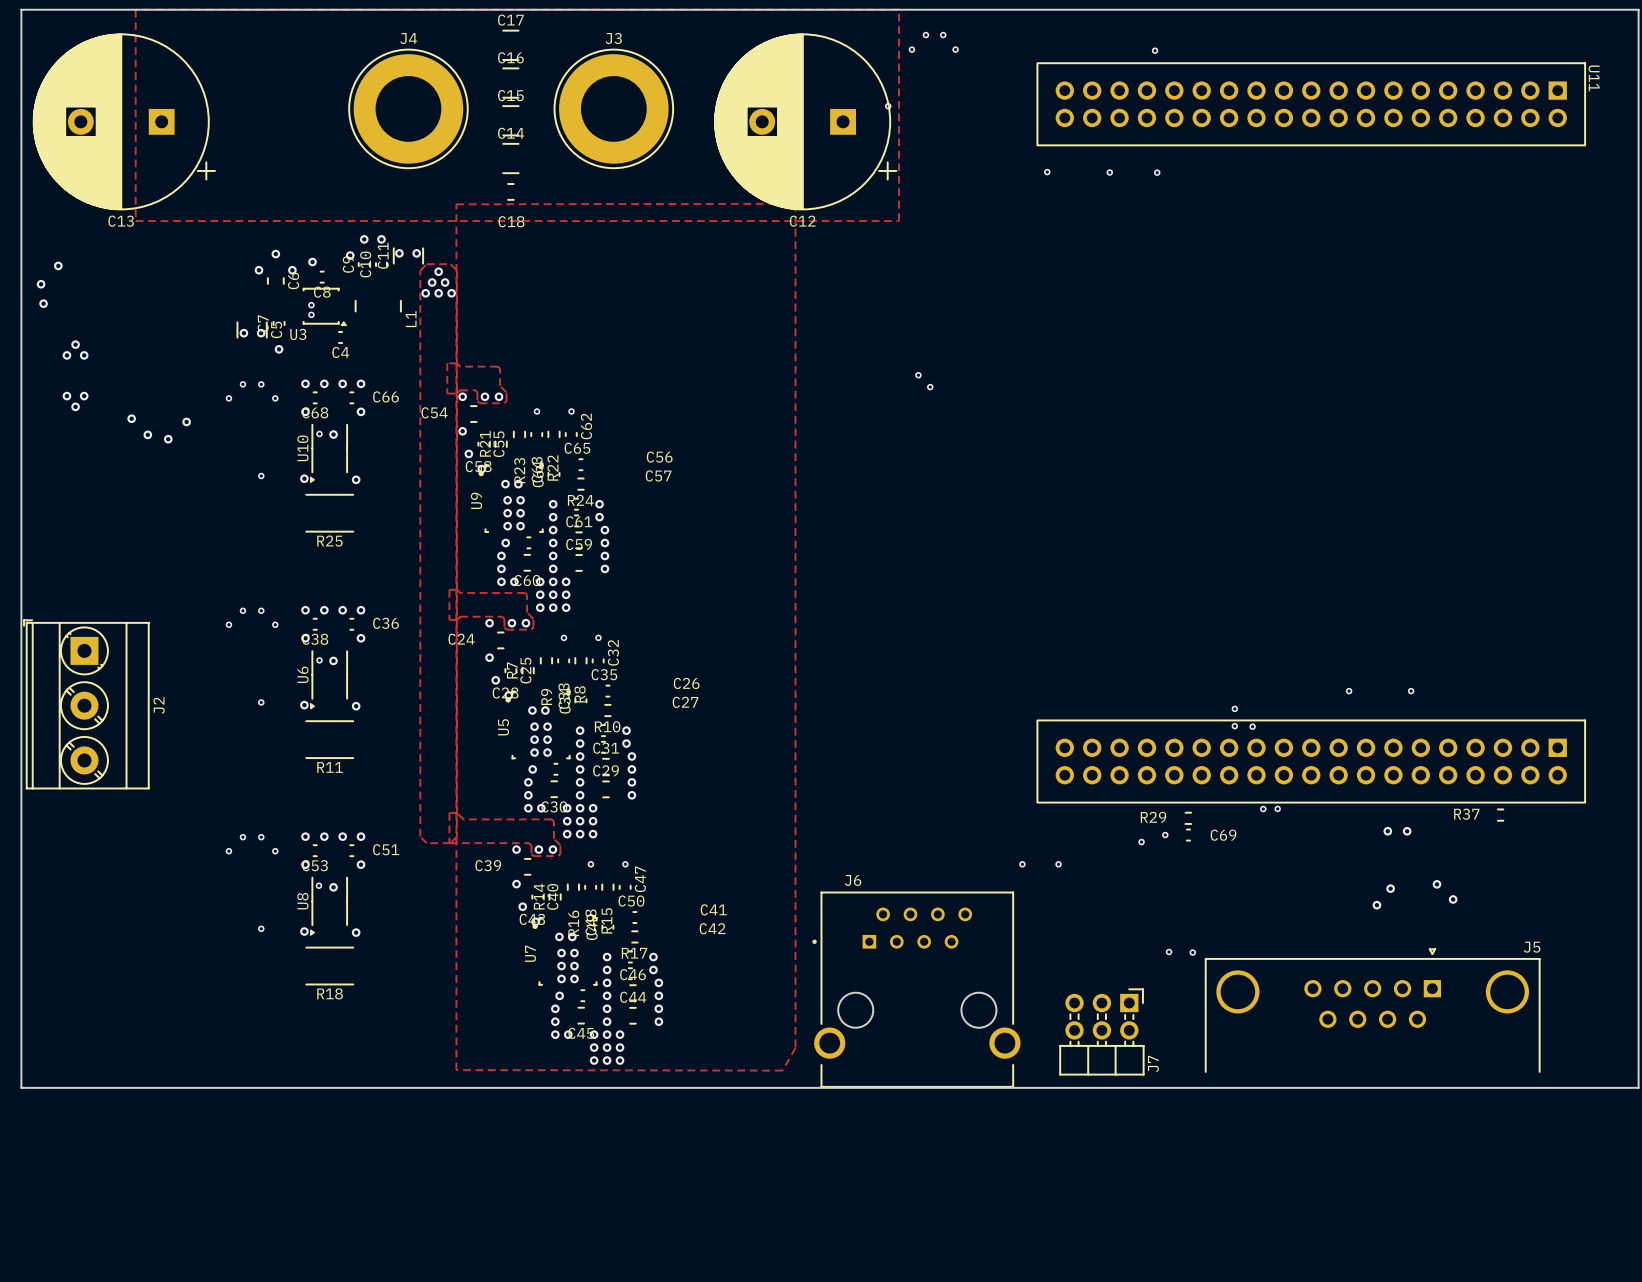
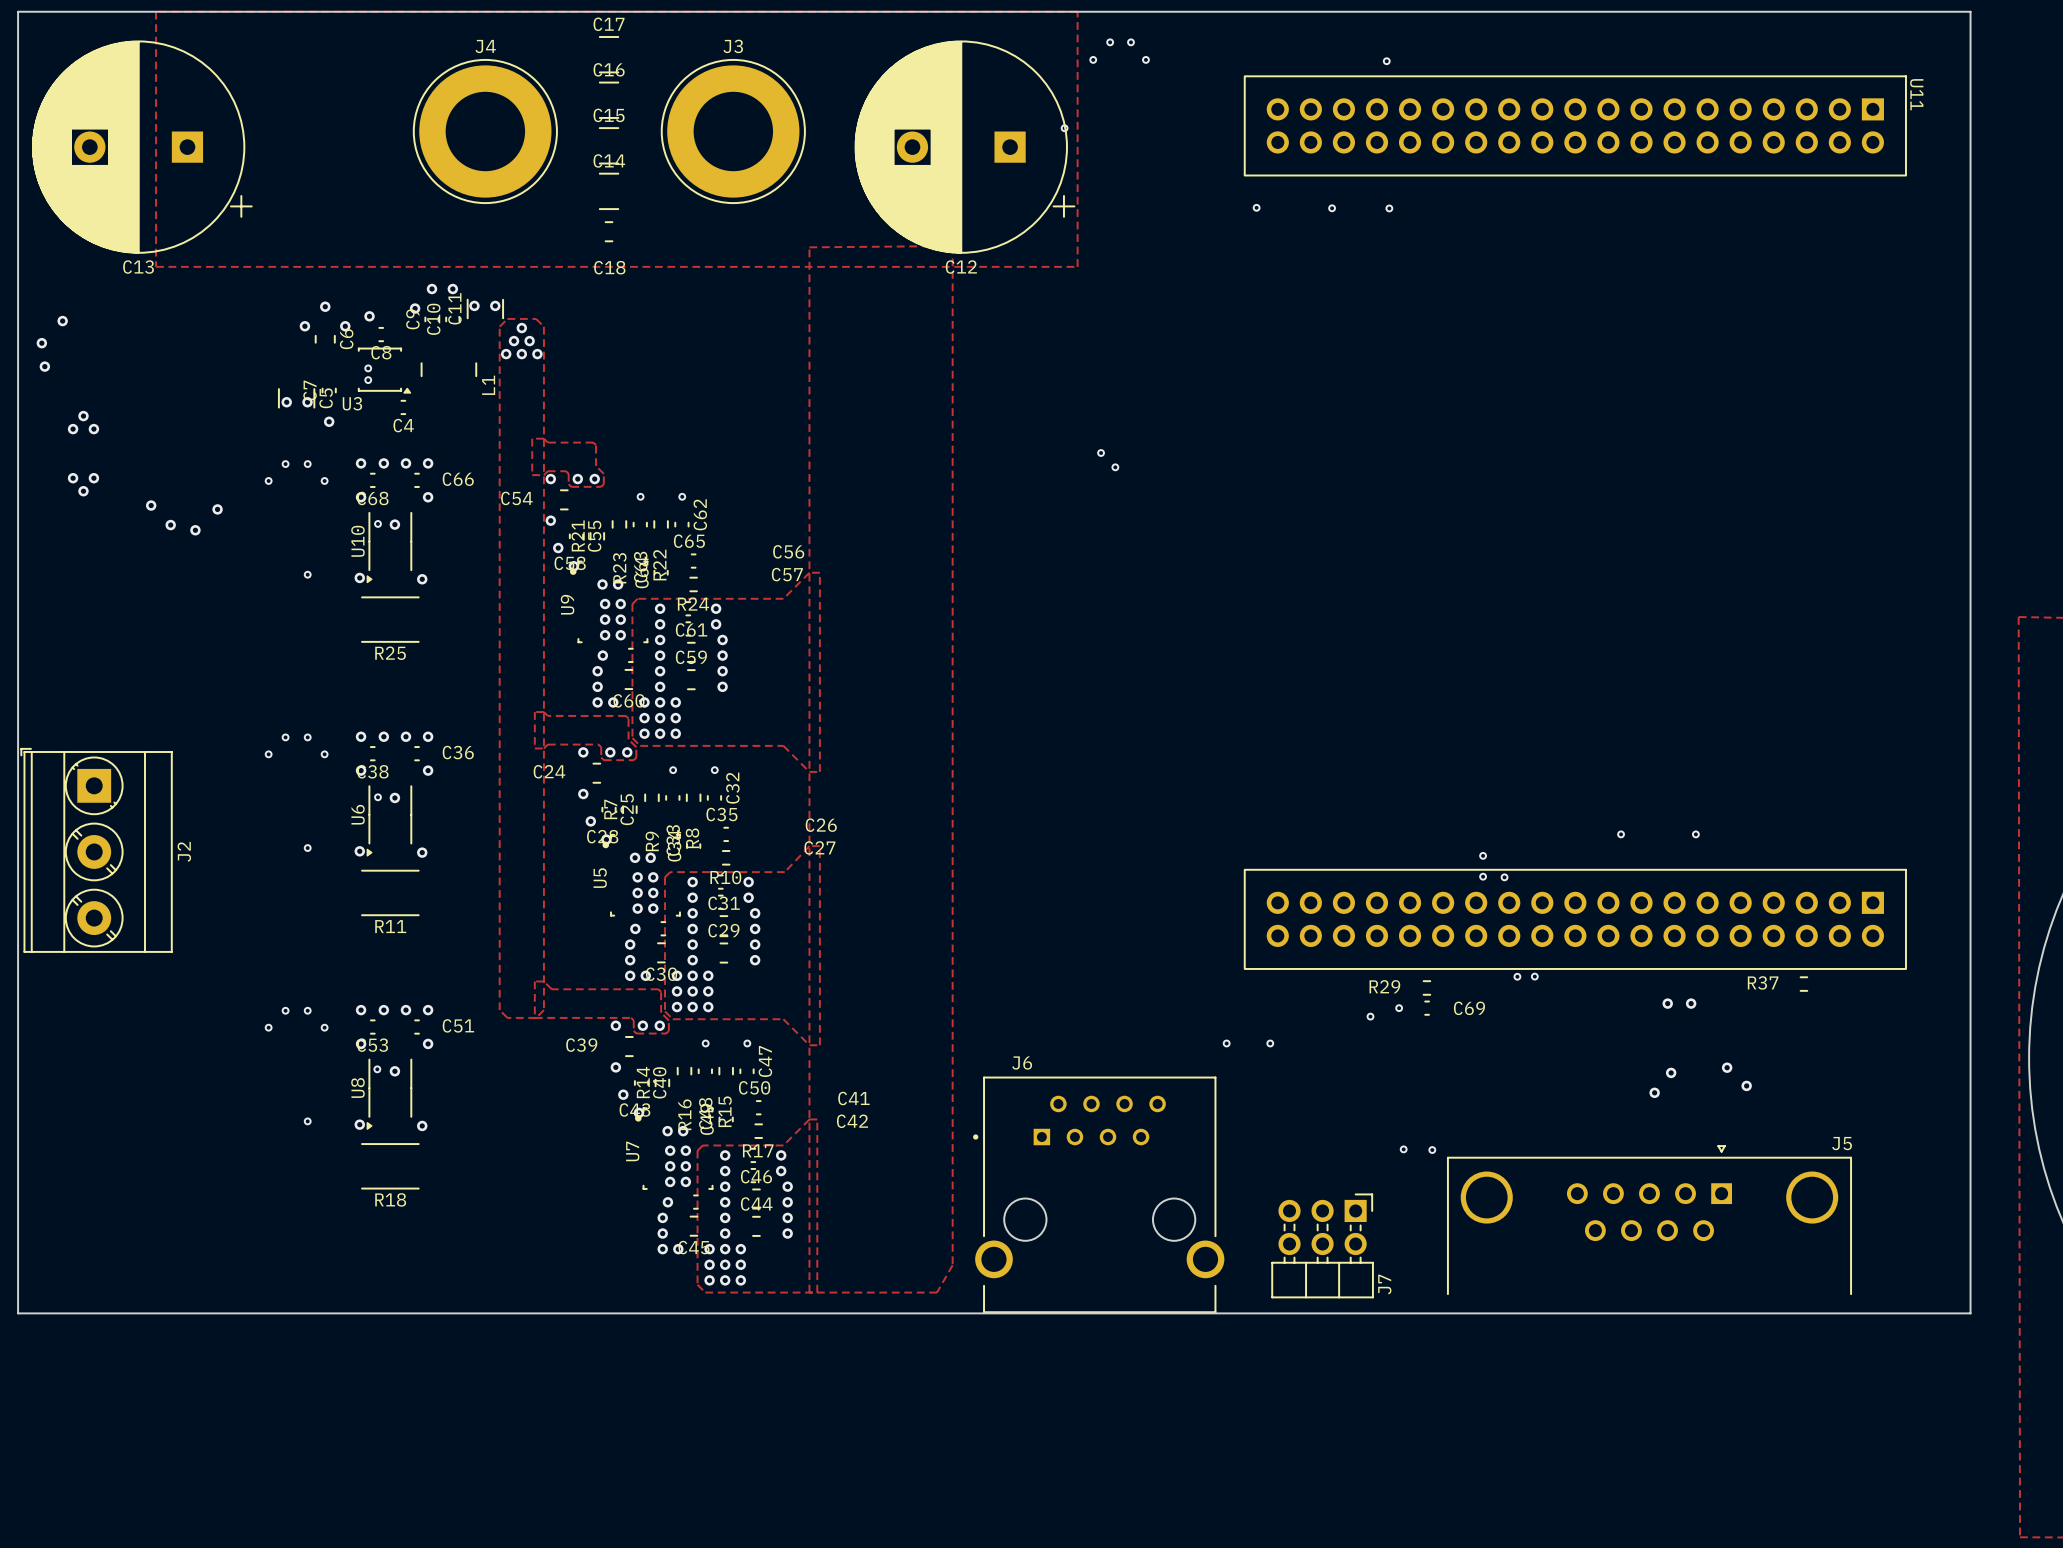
zone outline: (795, 203) (456, 204) (456, 1070) (782, 1070) -> (952, 246) (809, 247) (809, 1292)
zone outline: none -> (809, 572) (783, 598) (637, 598) (632, 603) (632, 738) (640, 745) (783, 745) (809, 771) (819, 771) (819, 572) (809, 572)
zone outline: none -> (809, 846) (784, 872) (670, 872) (664, 877) (664, 1011) (672, 1019) (783, 1019) (809, 1045) (819, 1045) (819, 846) (809, 846)
zone outline: none -> (817, 1292) (817, 1119) (809, 1119) (783, 1145) (702, 1145) (697, 1150) (697, 1284) (705, 1292) (937, 1292)

